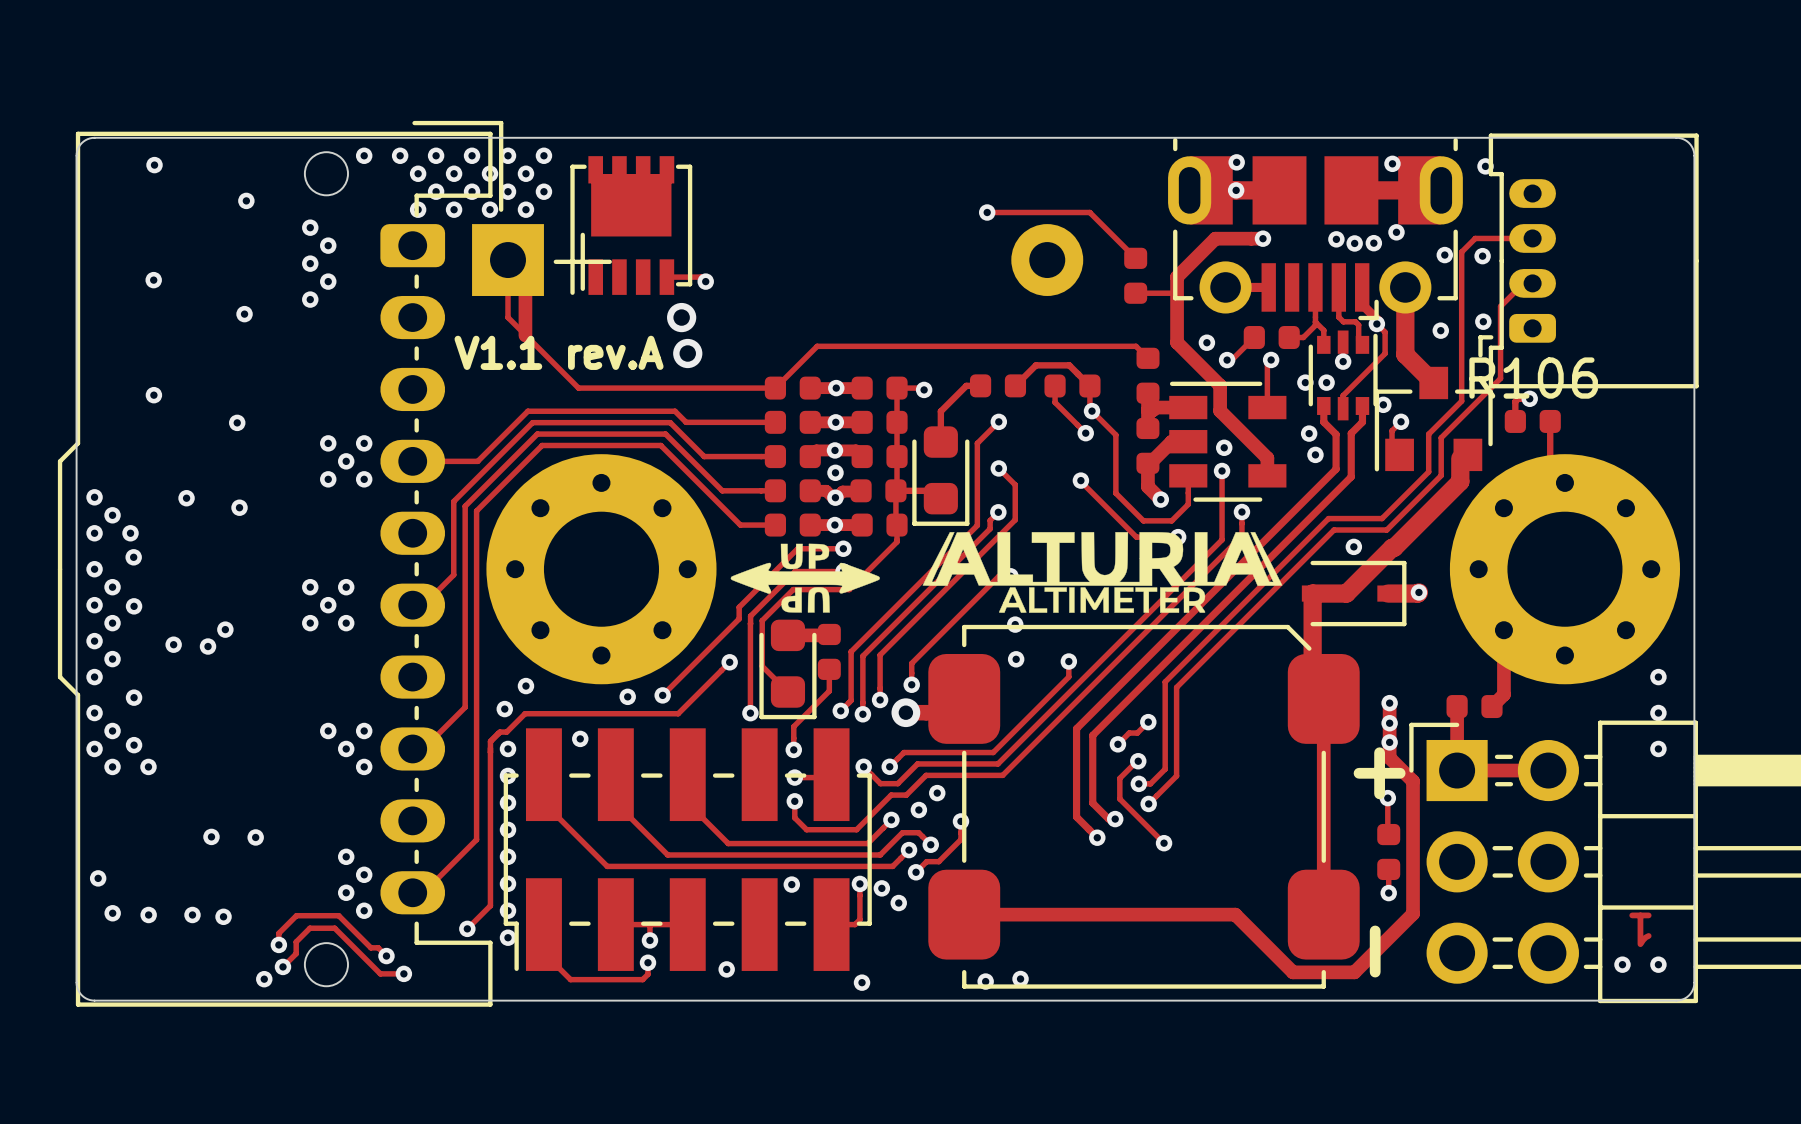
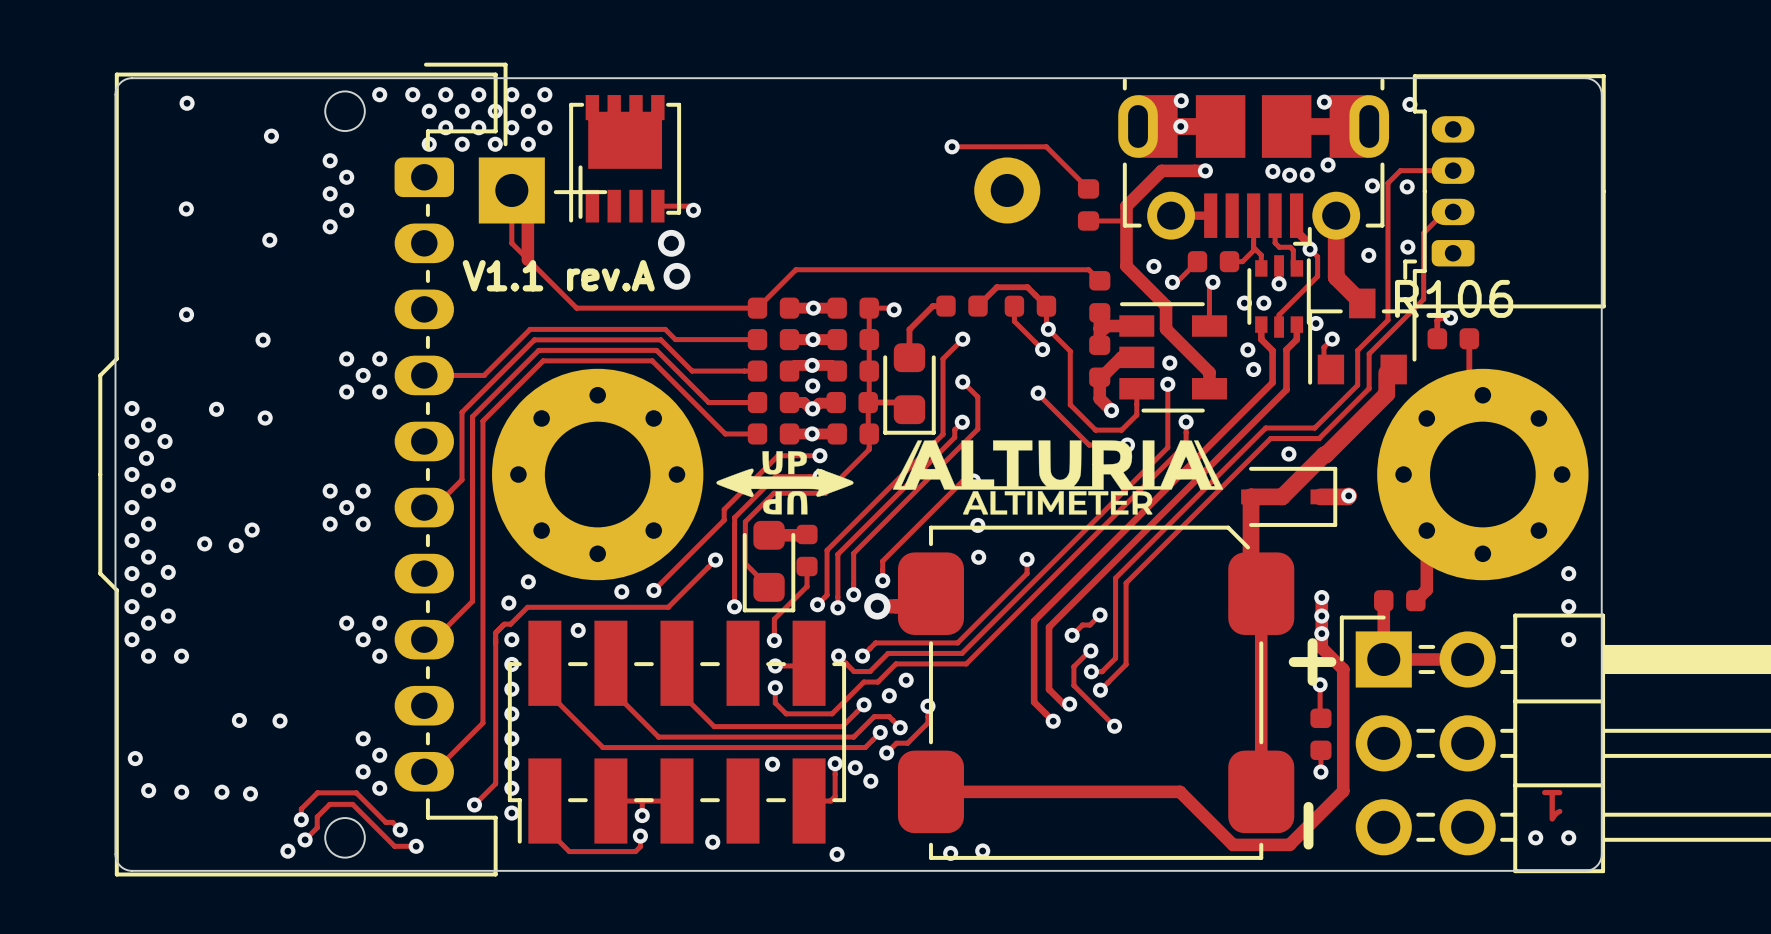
via: none -> (146, 458)
via: (133, 557) -> none
via: none -> (168, 485)
via: (134, 606) -> none
via: none -> (168, 572)
via: none -> (148, 590)
via: (134, 697) -> none
via: none -> (168, 616)
via: (134, 745) -> none

